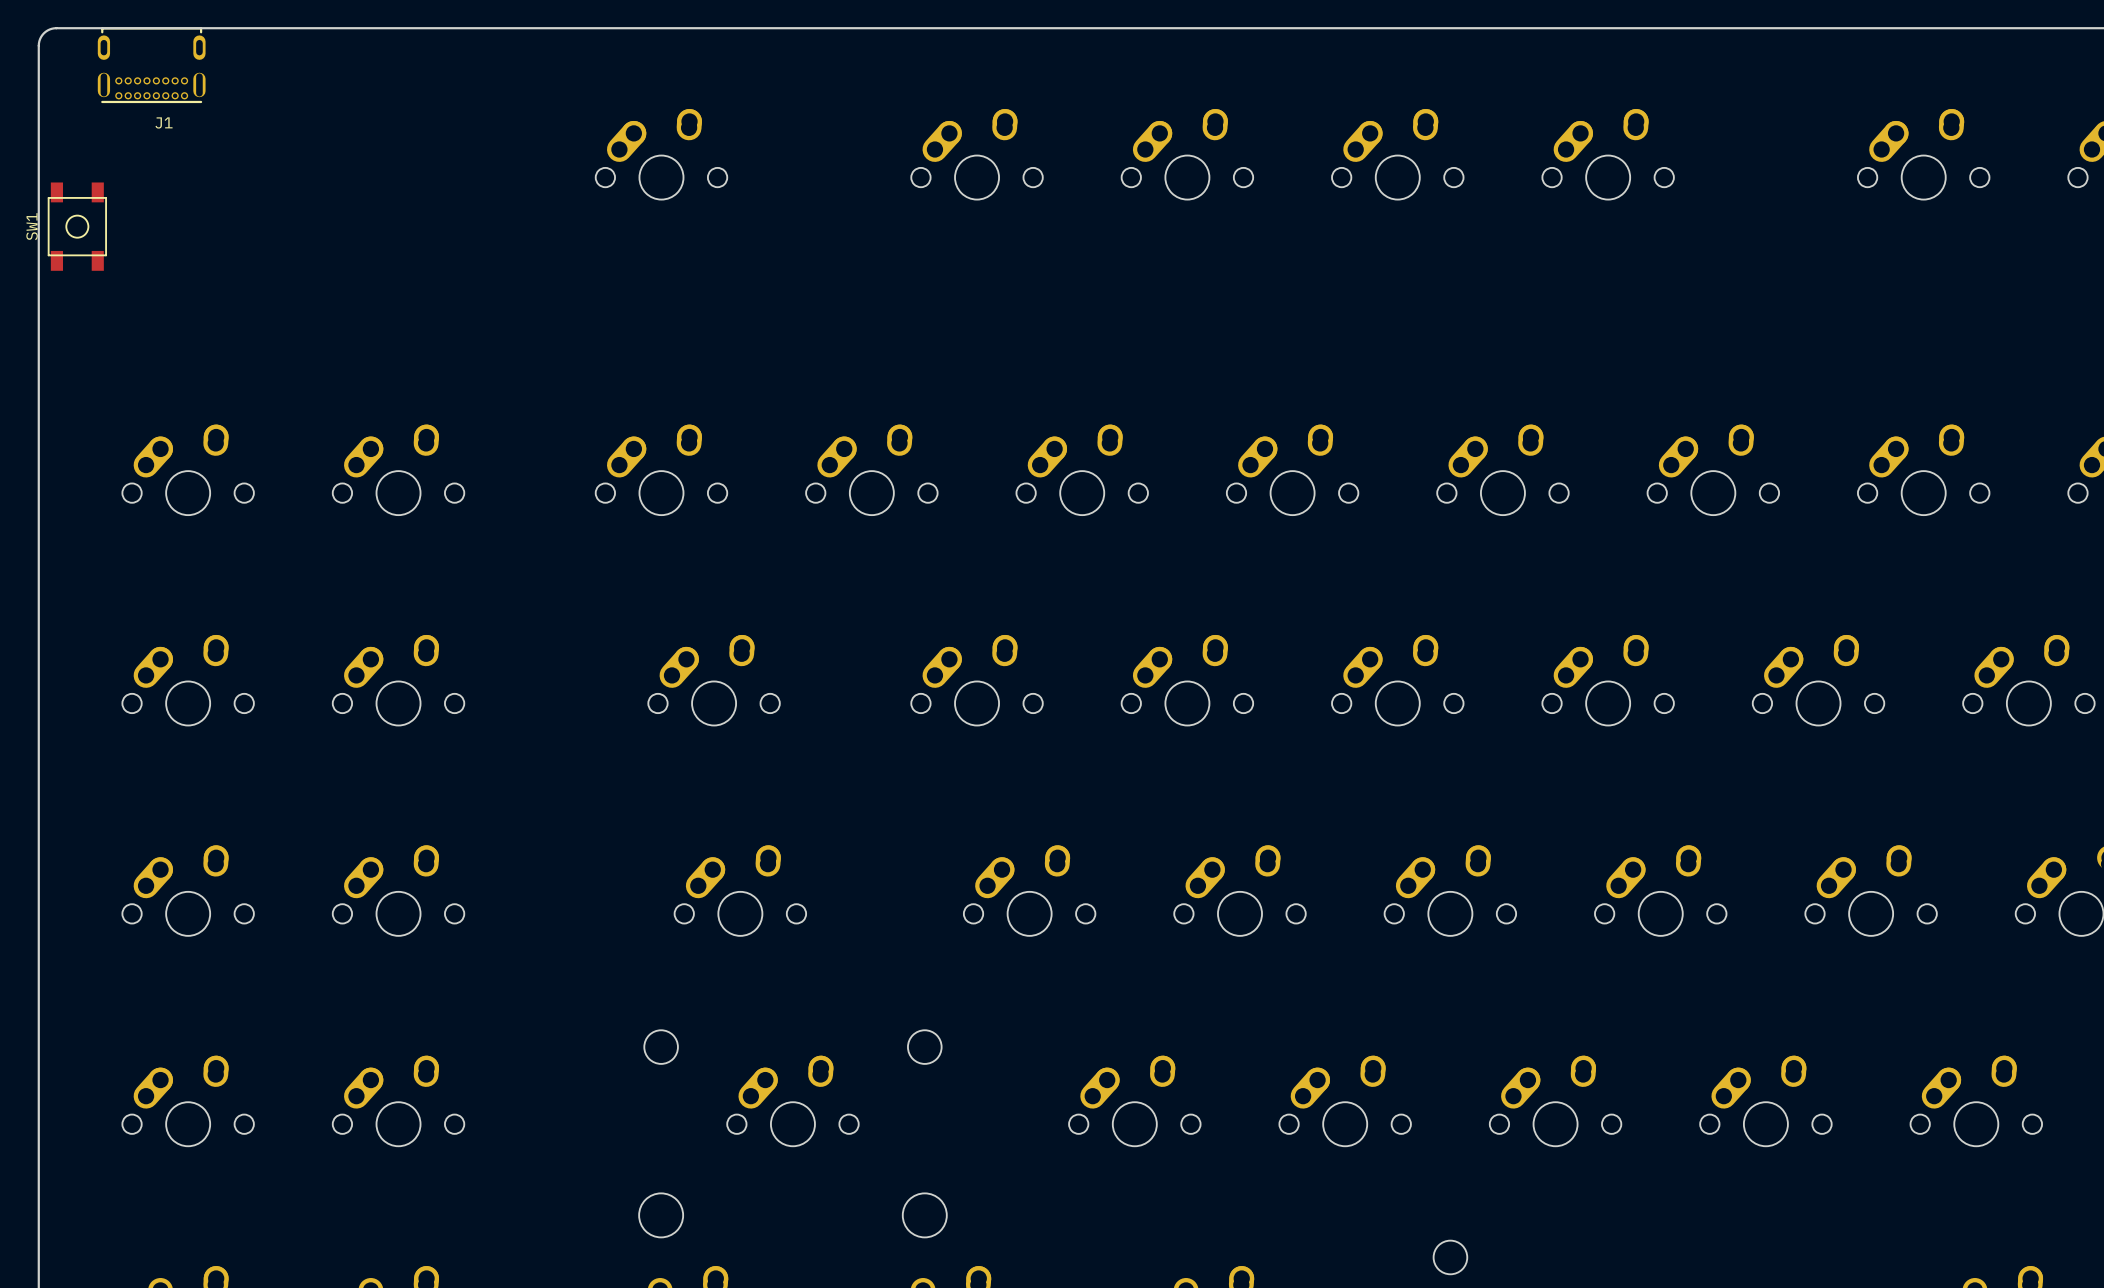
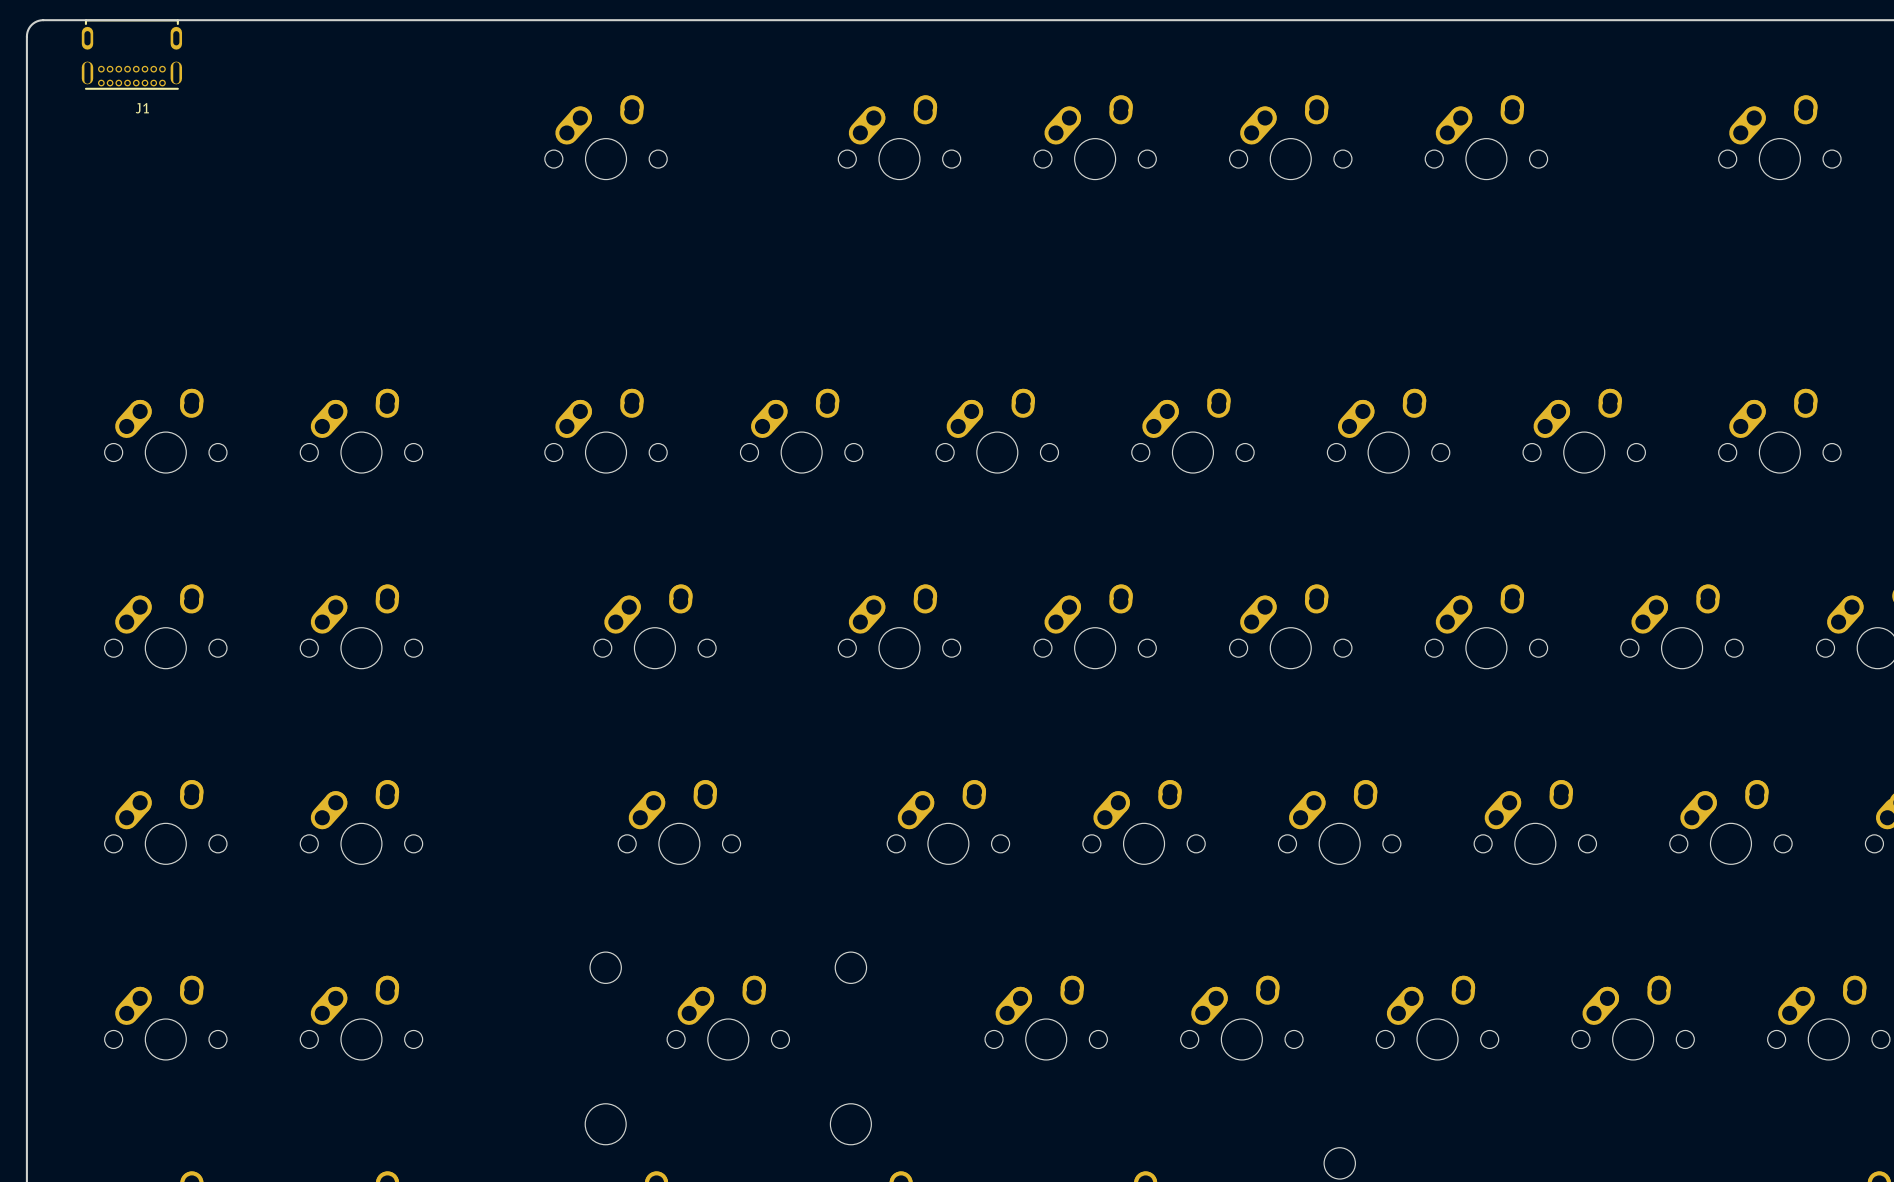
SW1: (77, 226) -> none

